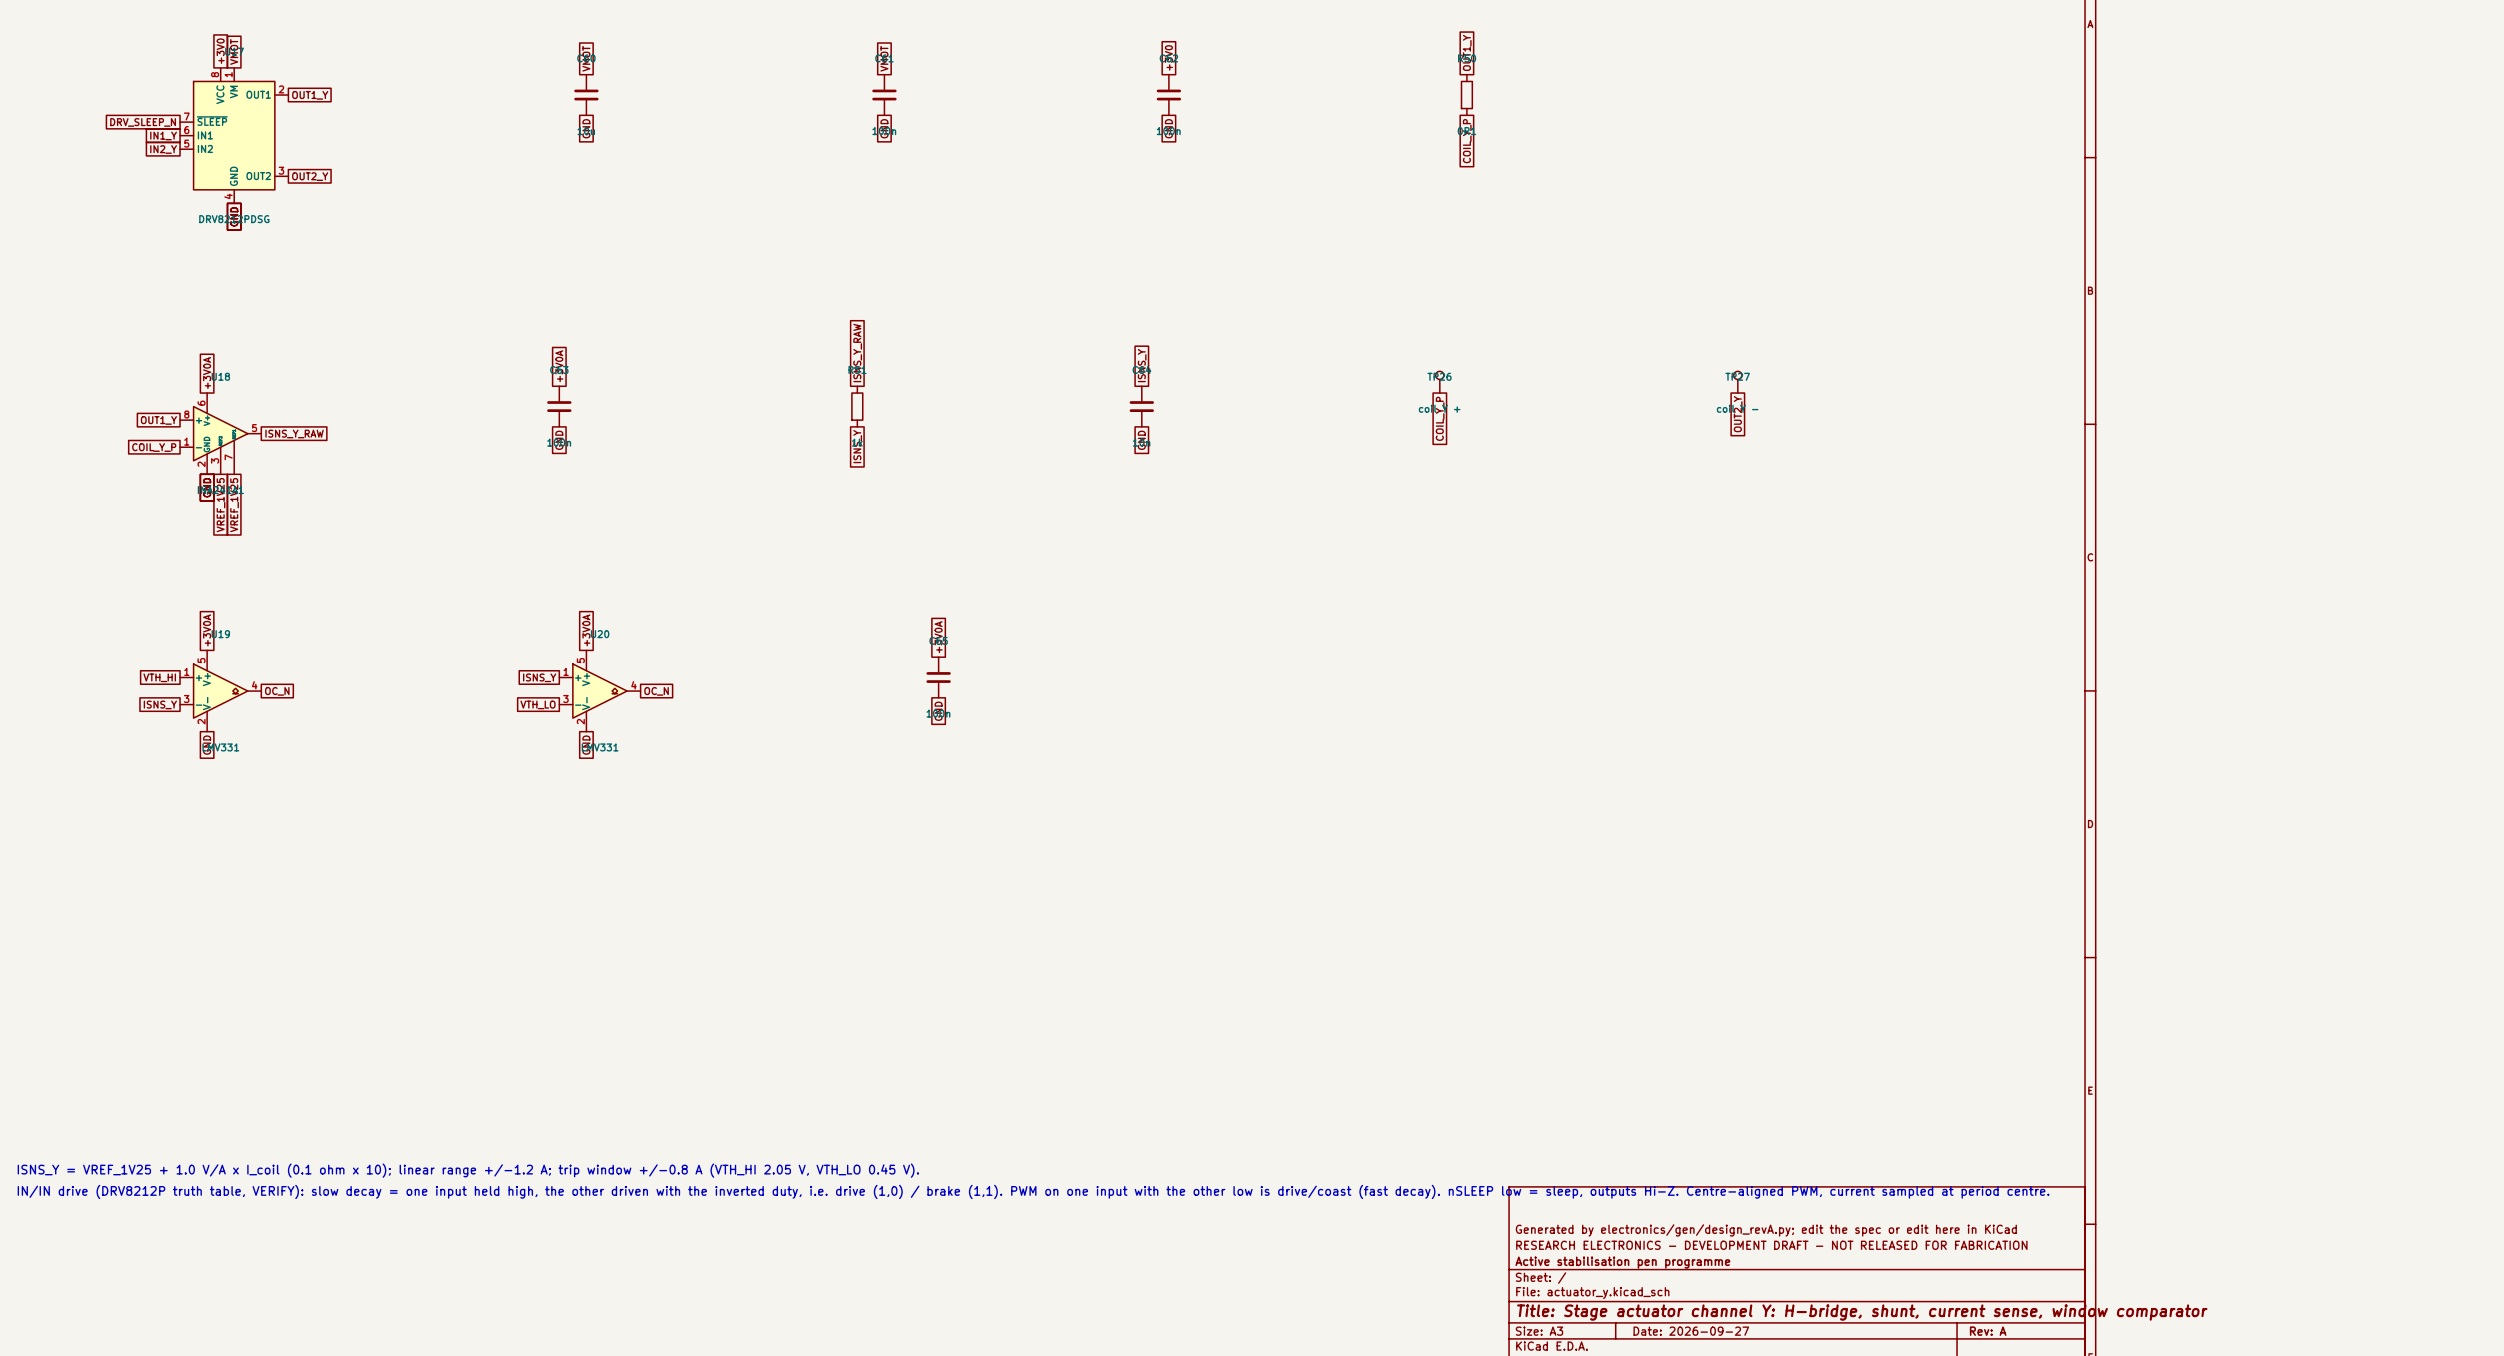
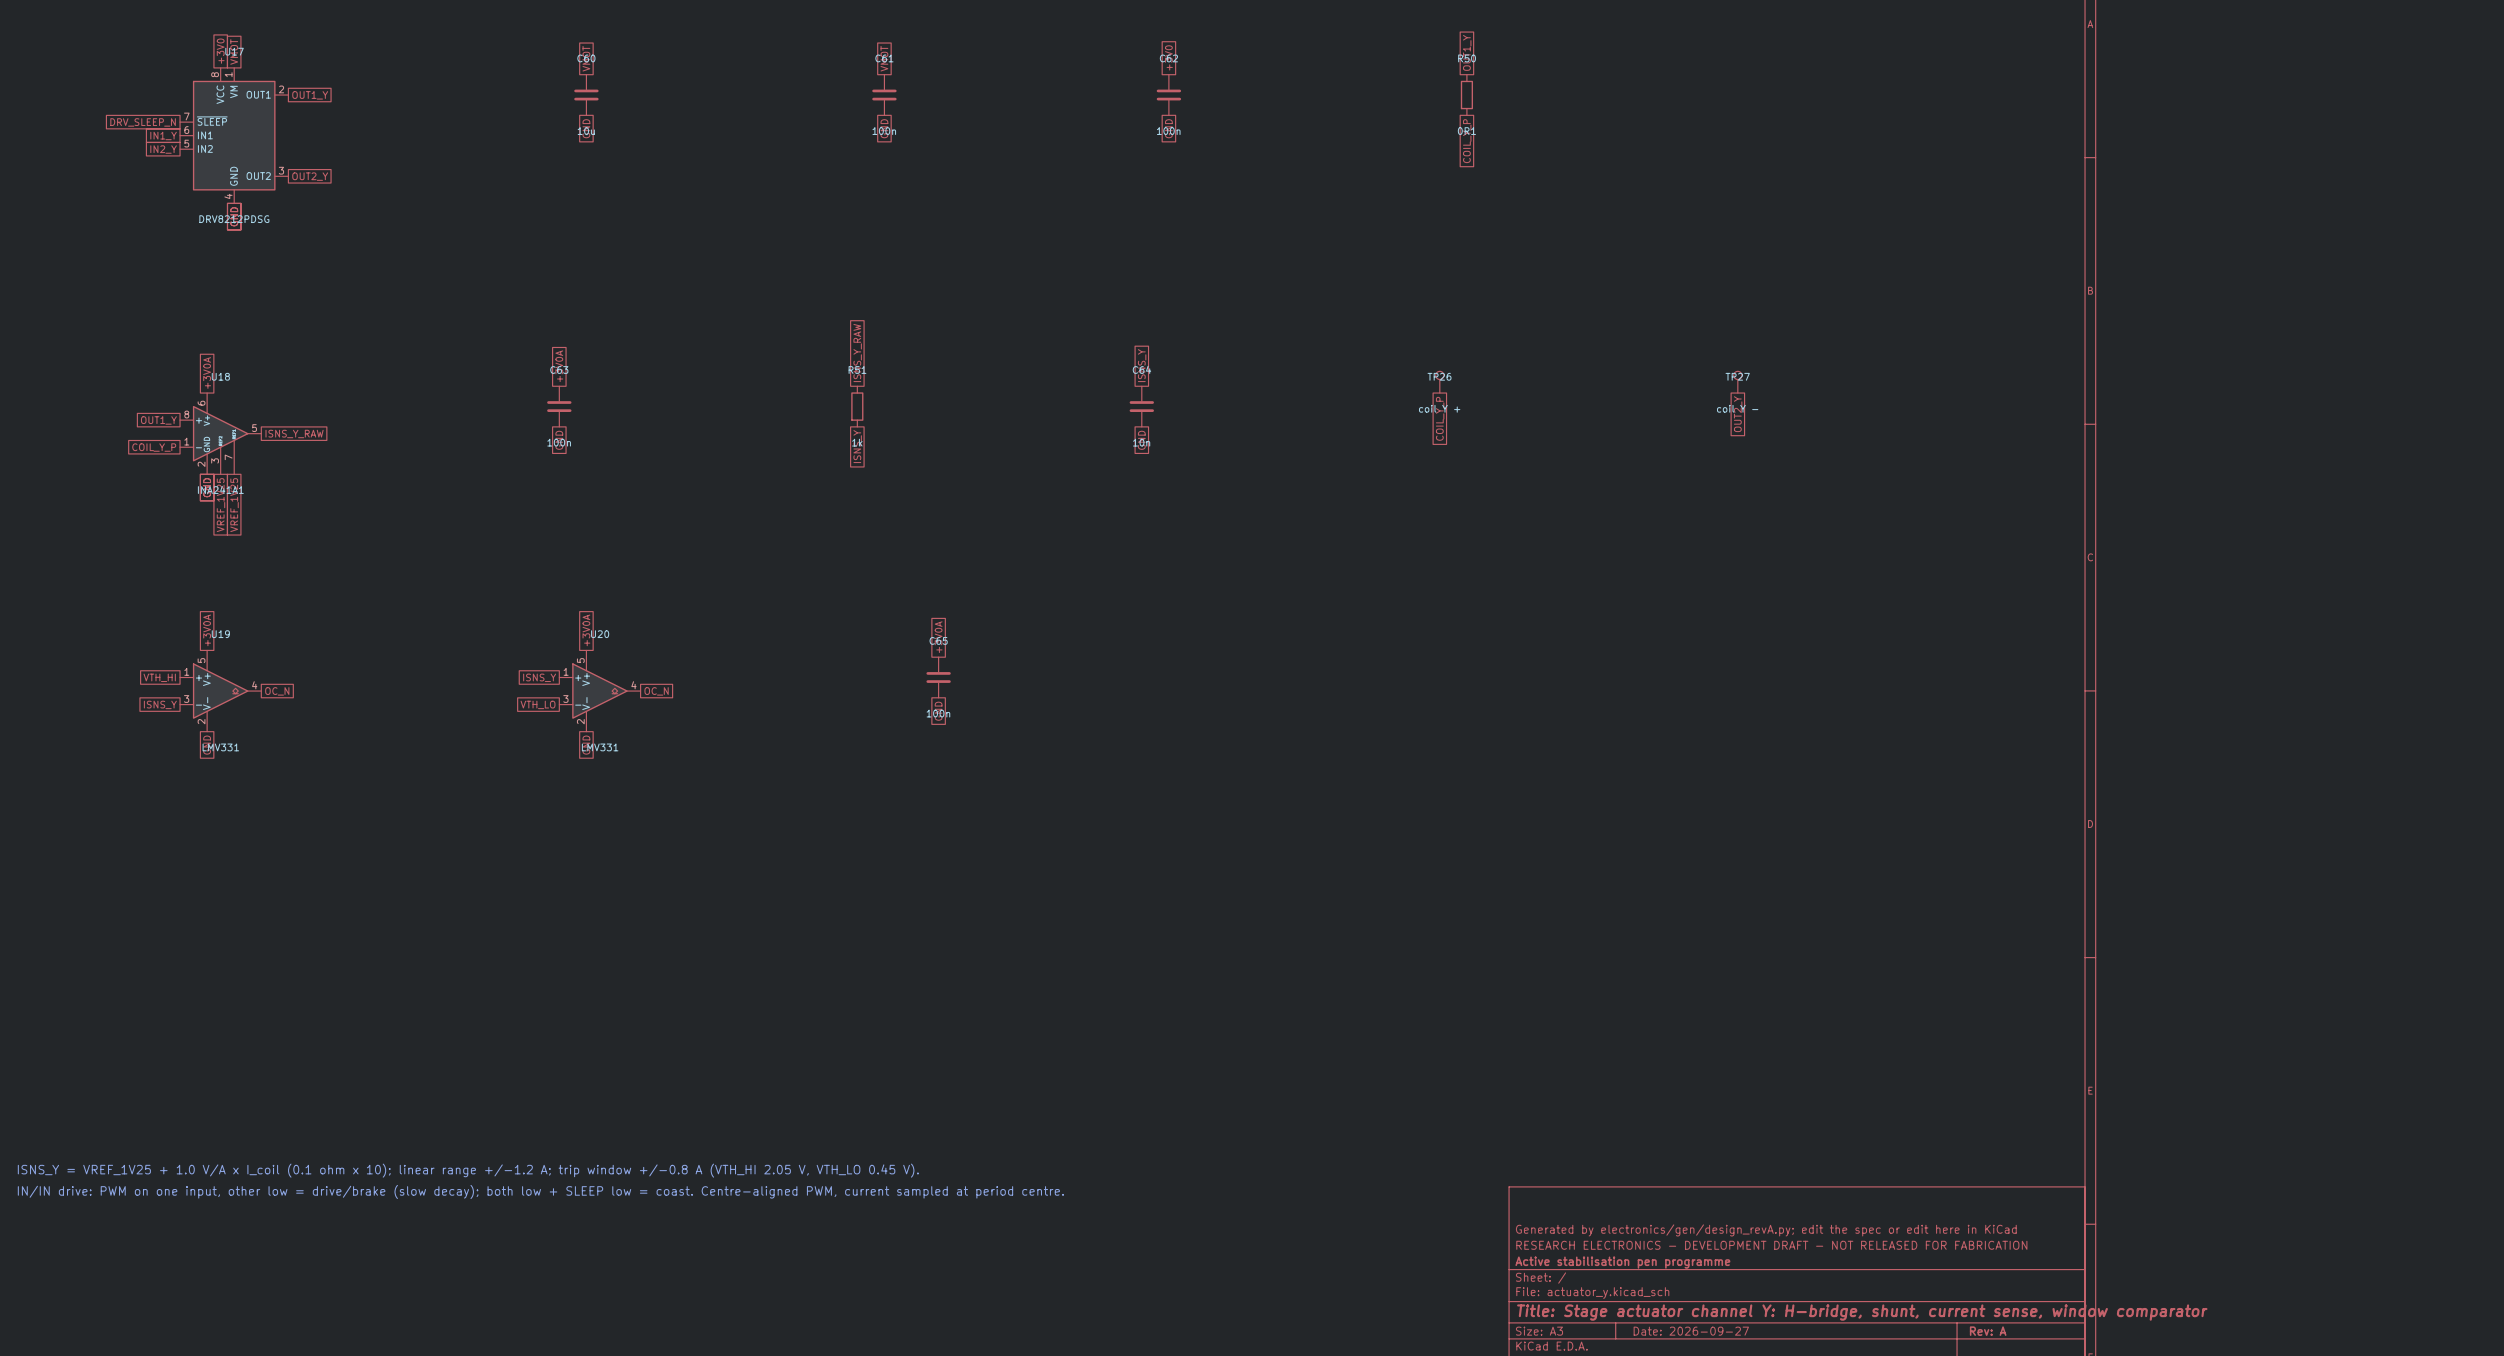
text: IN/IN drive (DRV8212P truth table, VERIFY): slow decay = one input held high, the other driven with the inverted duty, i.e. drive (1,0) / brake (1,1). PWM on one input with the other low is drive/coast (fast decay). nSLEEP low = sleep, outputs Hi-Z. Centre-aligned PWM, current sampled at period centre. (1033, 1191) -> IN/IN drive: PWM on one input, other low = drive/brake (slow decay); both low + SLEEP low = coast. Centre-aligned PWM, current sampled at period centre. (540, 1191)

